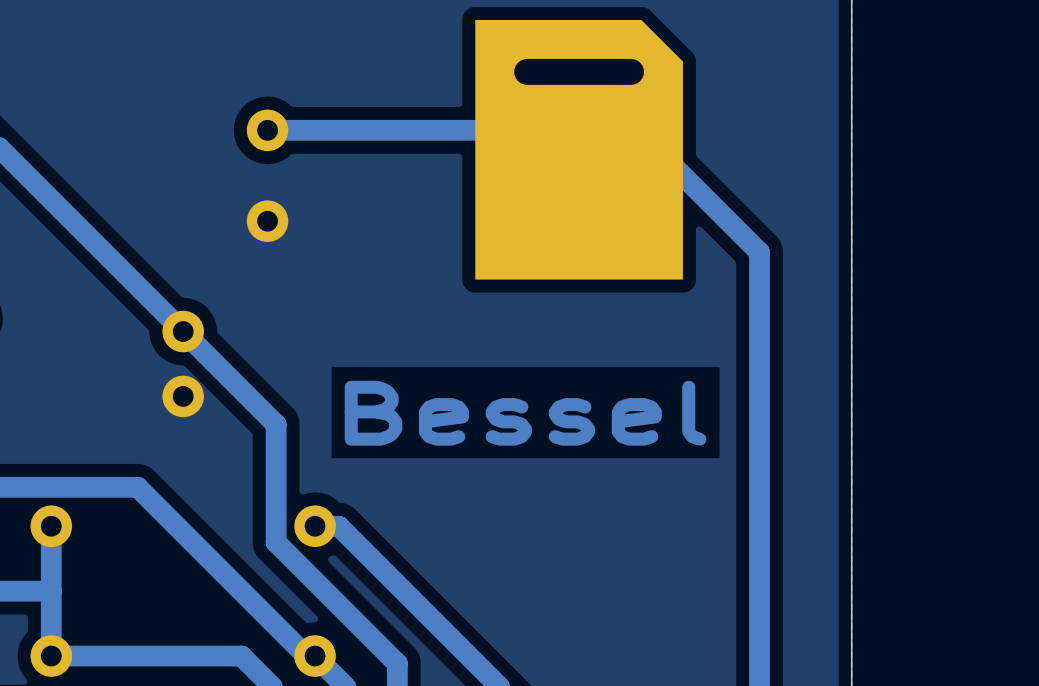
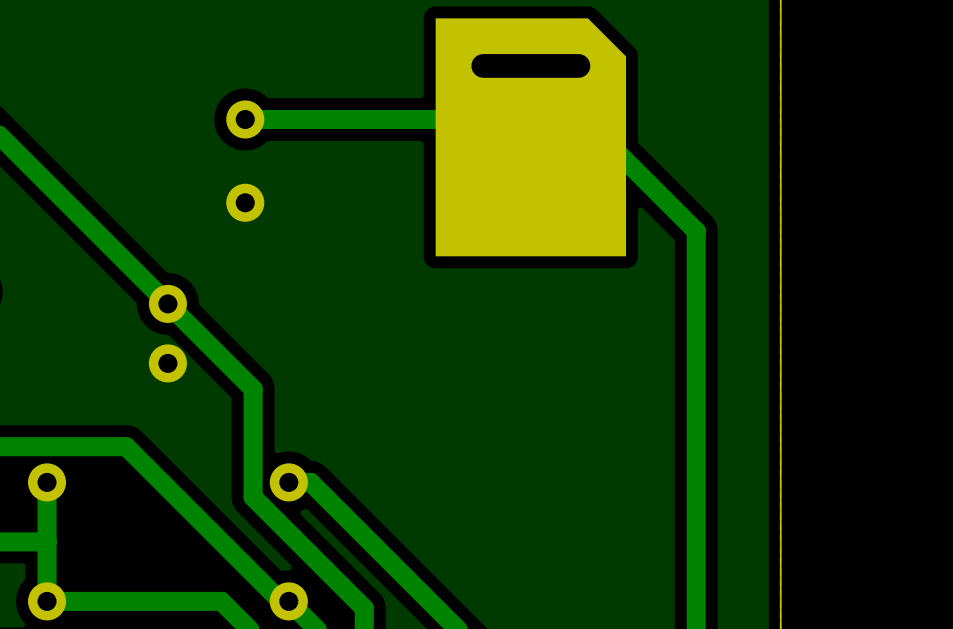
text: Bessel (525, 413) -> none

